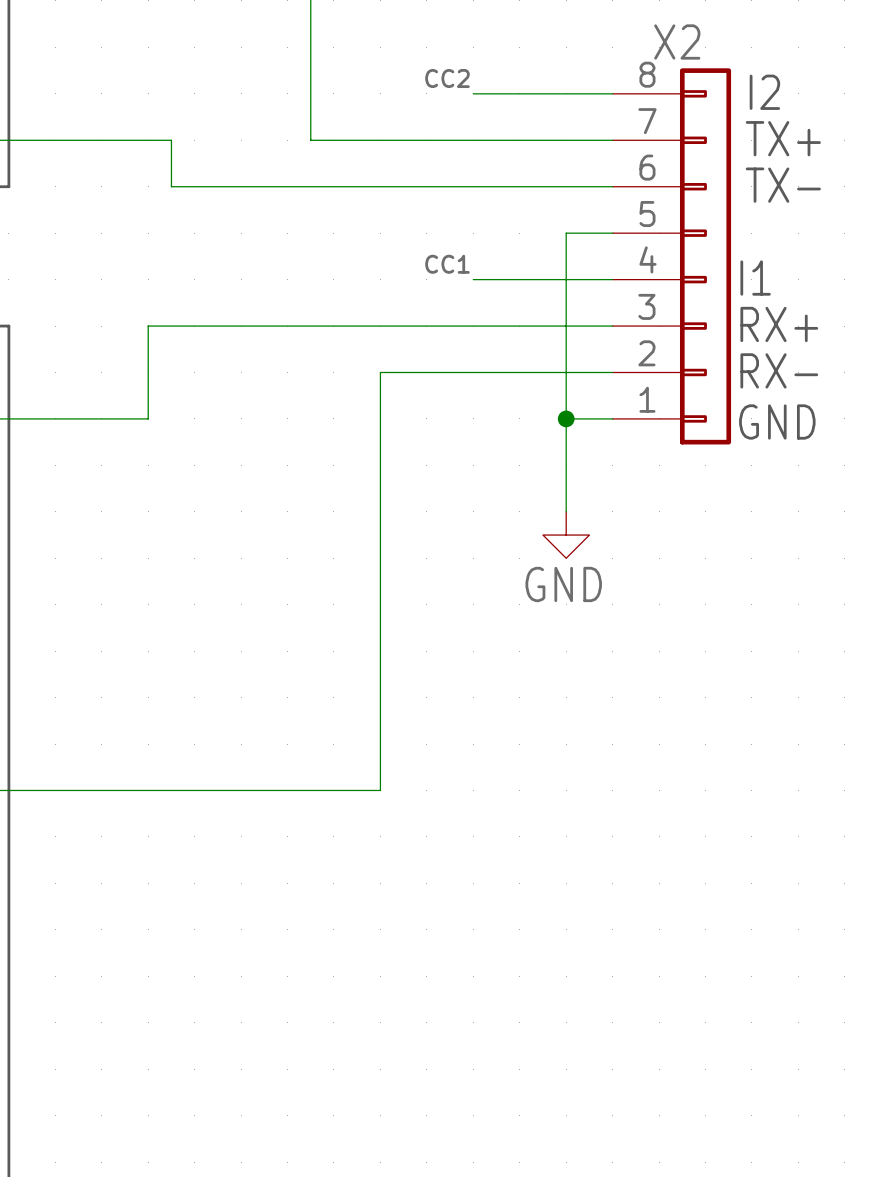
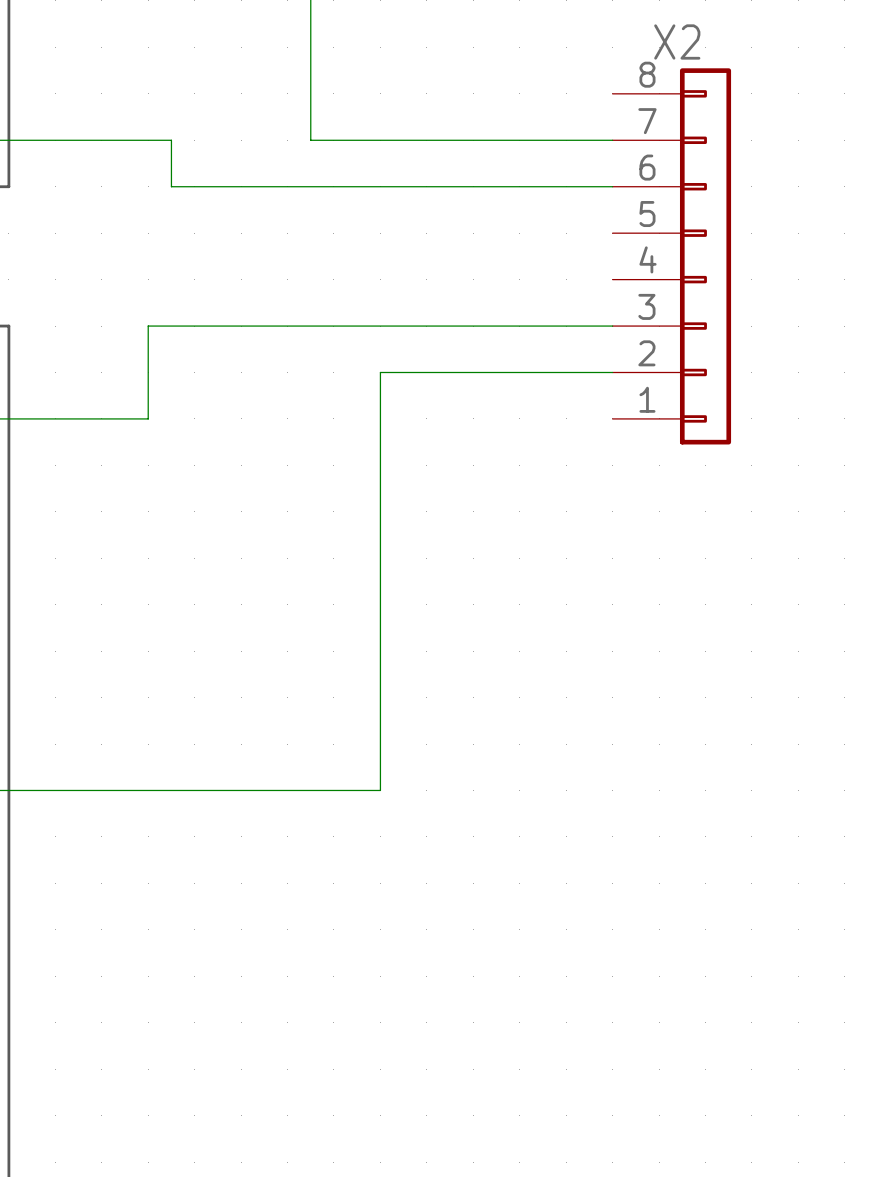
label: CC2 (447, 78) -> none
text: I2 (764, 92) -> none
wire: (473, 93) (612, 93) -> none
text: TX+ (783, 138) -> none
text: TX- (783, 185) -> none
wire: (612, 233) (566, 233) (566, 511) -> none
label: CC1 (447, 264) -> none
text: I1 (755, 278) -> none
wire: (473, 279) (612, 279) -> none
text: RX+ (779, 324) -> none
text: RX- (779, 370) -> none
wire: (566, 418) (612, 418) -> none
junction: (566, 418) -> none
text: GND (777, 422) -> none
power symbol: GND (566, 535) -> none

